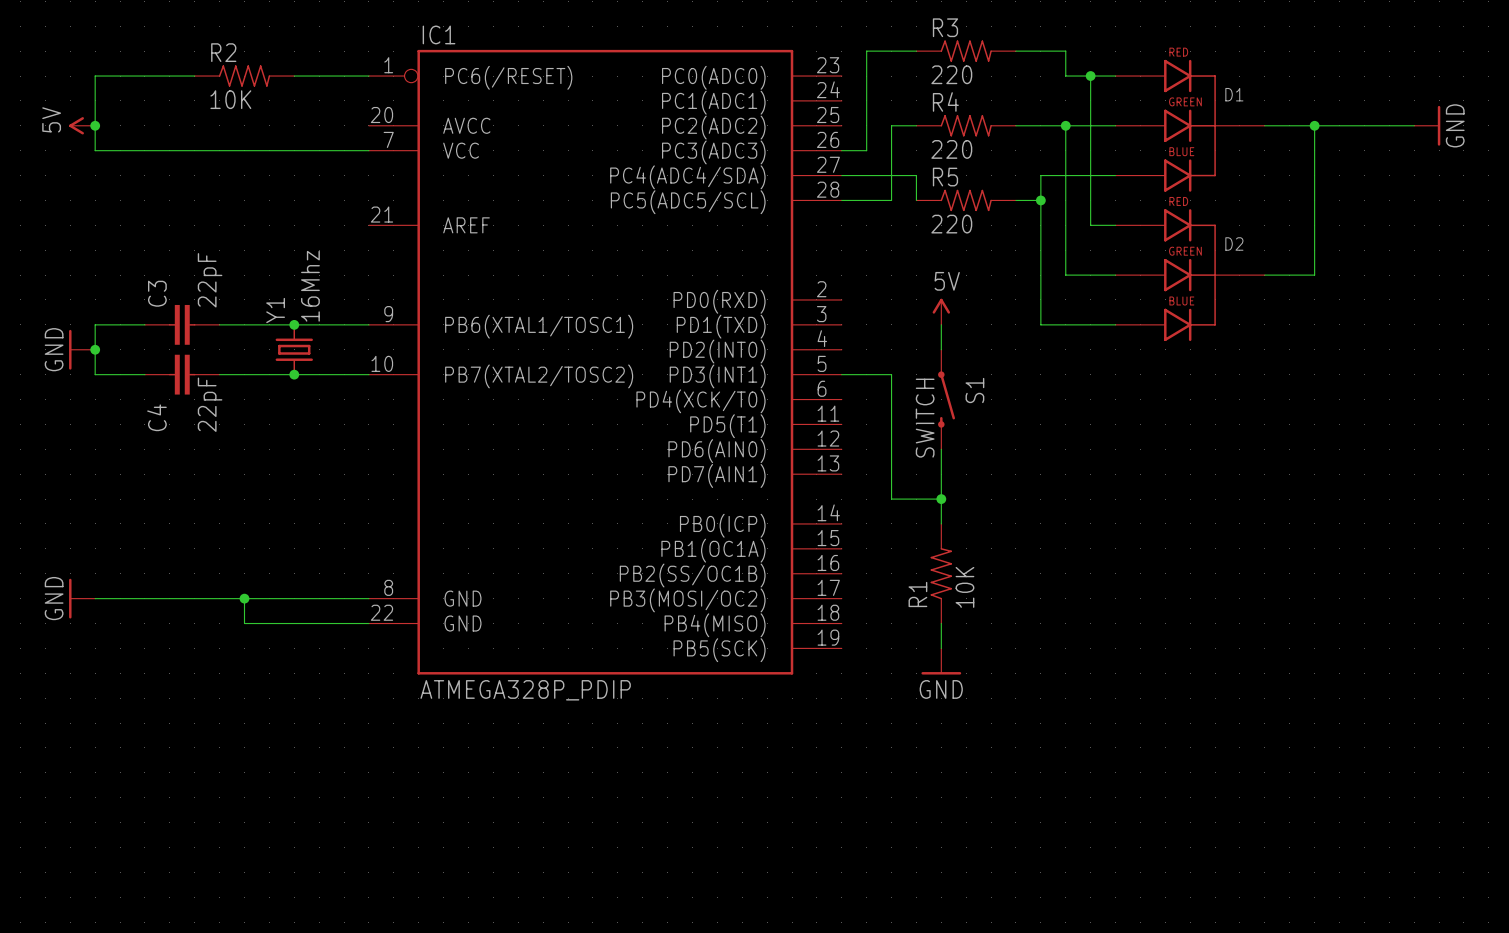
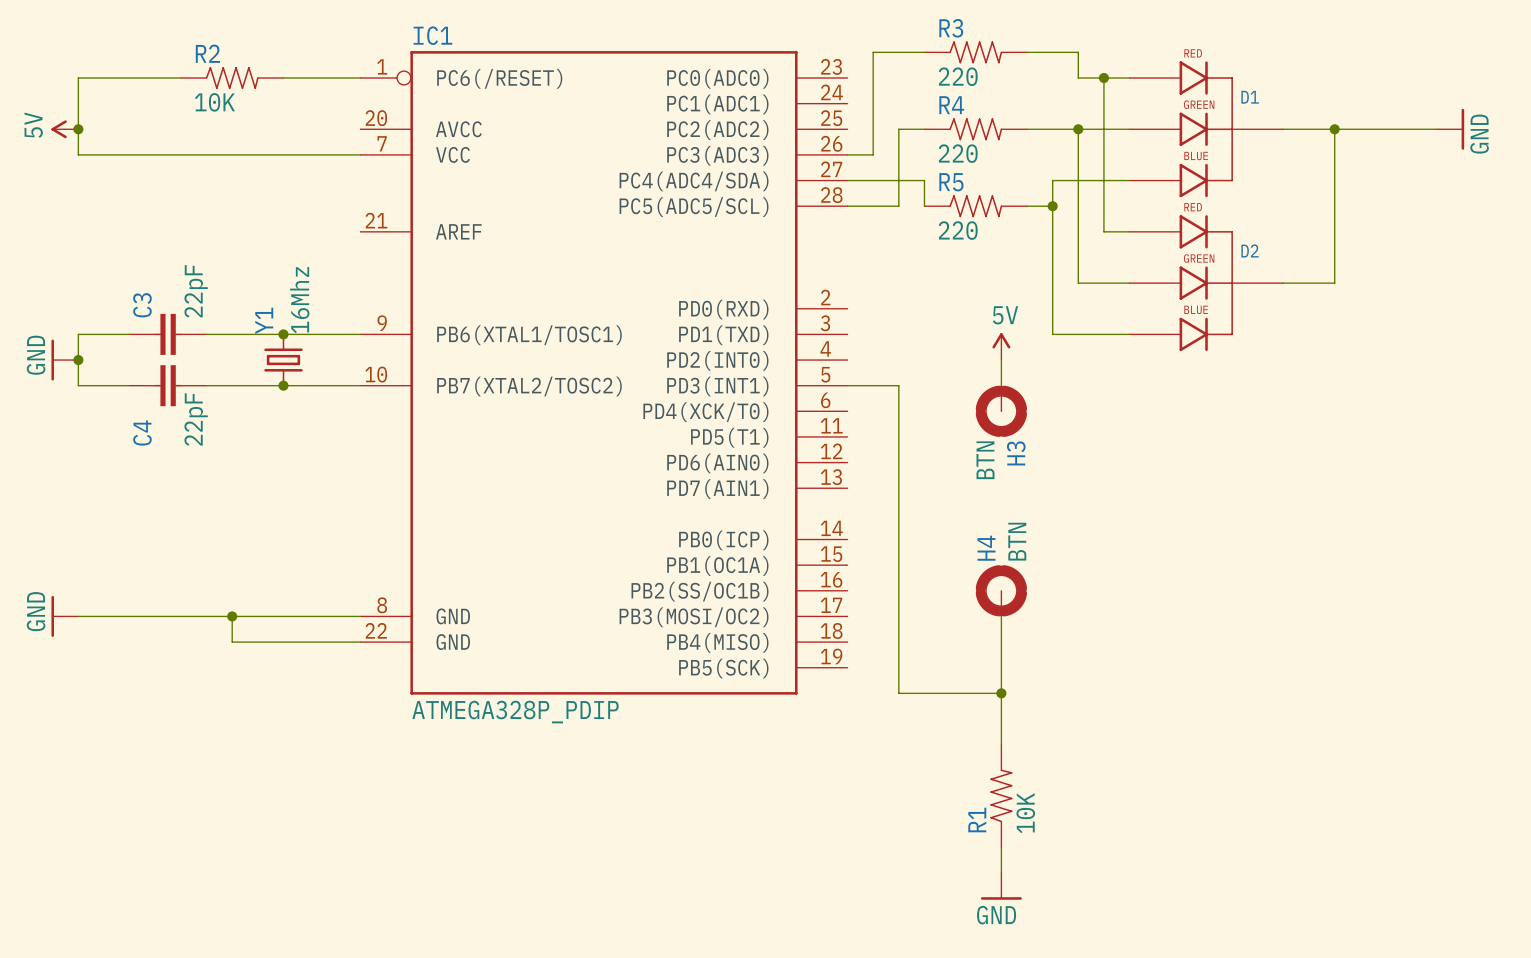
power symbol position: 5V (941, 311) -> 5V (1001, 346)
wire: (941, 324) (941, 349) -> (1001, 360) (1001, 385)
S1: SWITCH (946, 399) -> none
H3: none -> BTN (1001, 411)
wire: (941, 449) (941, 523) -> none
wire: (891, 499) (941, 499) -> (898, 513) (898, 693) (1001, 693)
junction: (941, 499) -> none
R1 position: (941, 573) -> (1001, 795)
H4: none -> BTN (1001, 590)
wire: none -> (1001, 616) (1001, 744)
wire: (941, 623) (941, 648) -> (1001, 847) (1001, 872)
power symbol position: GND (941, 661) -> GND (1001, 886)
junction: none -> (1001, 693)

